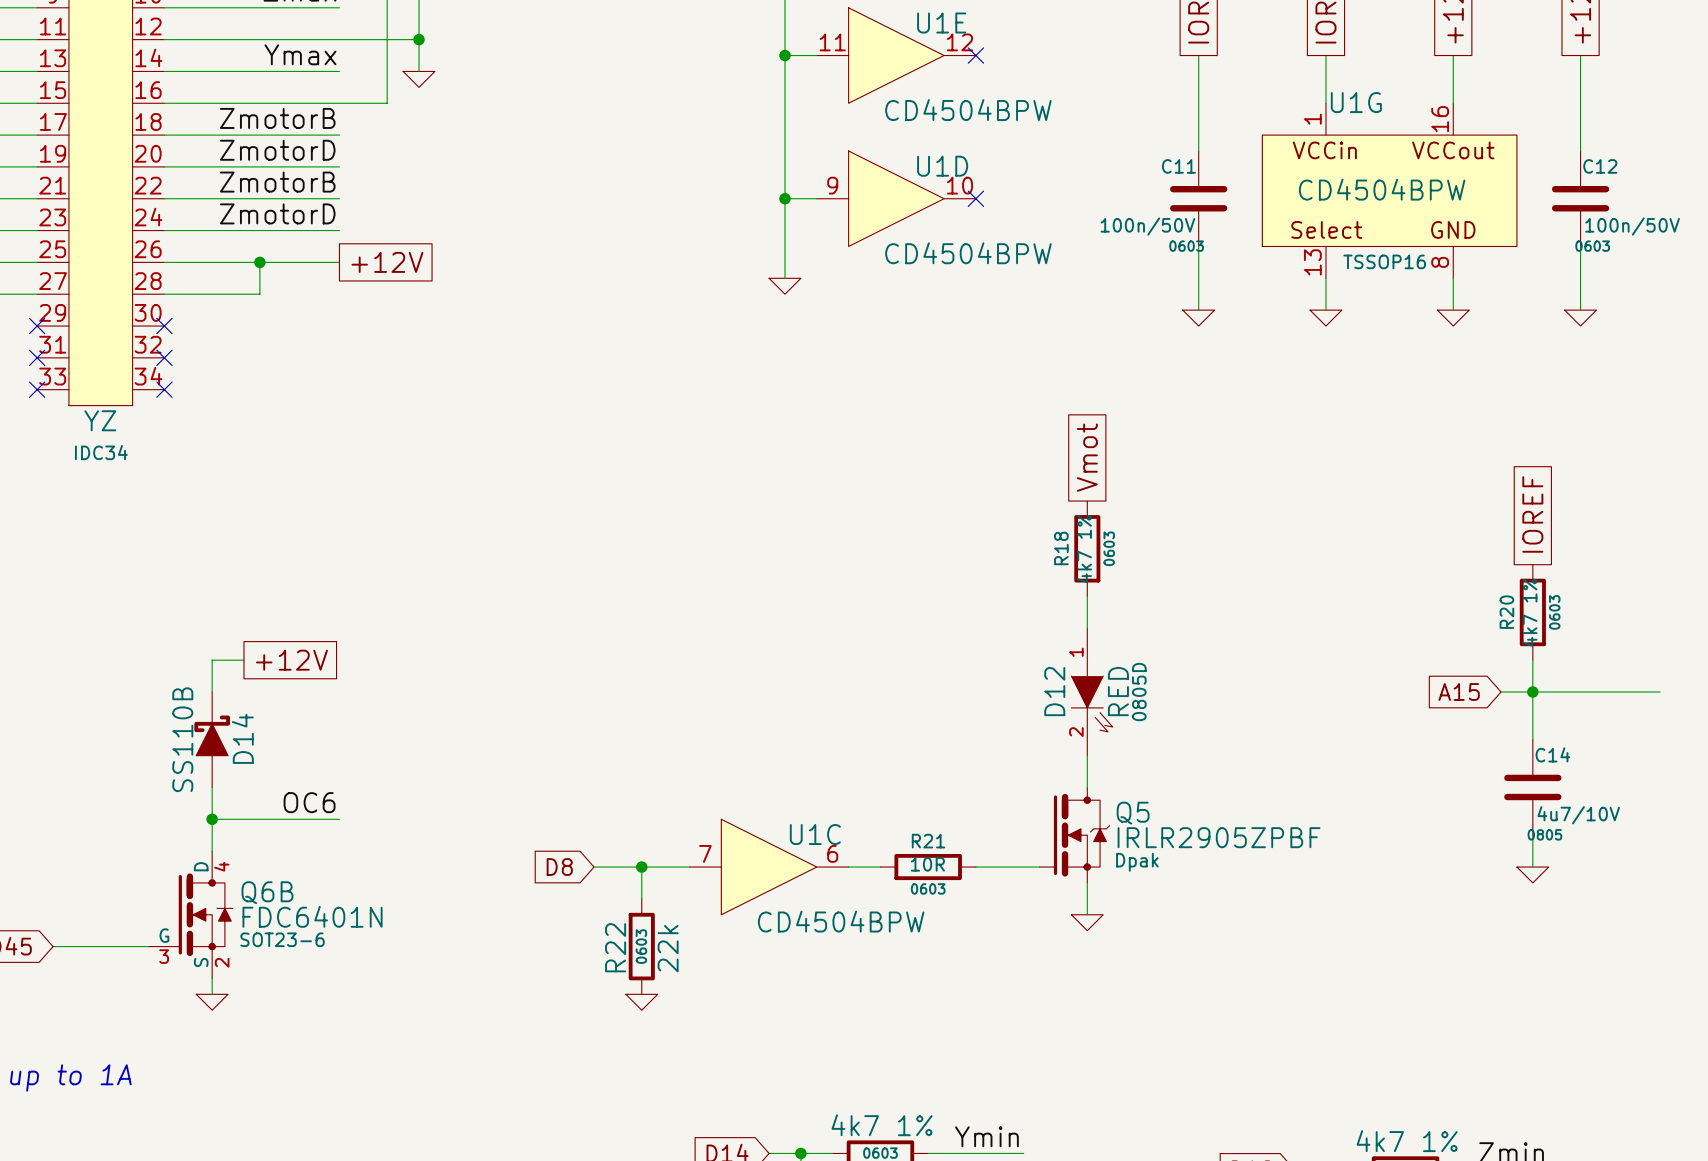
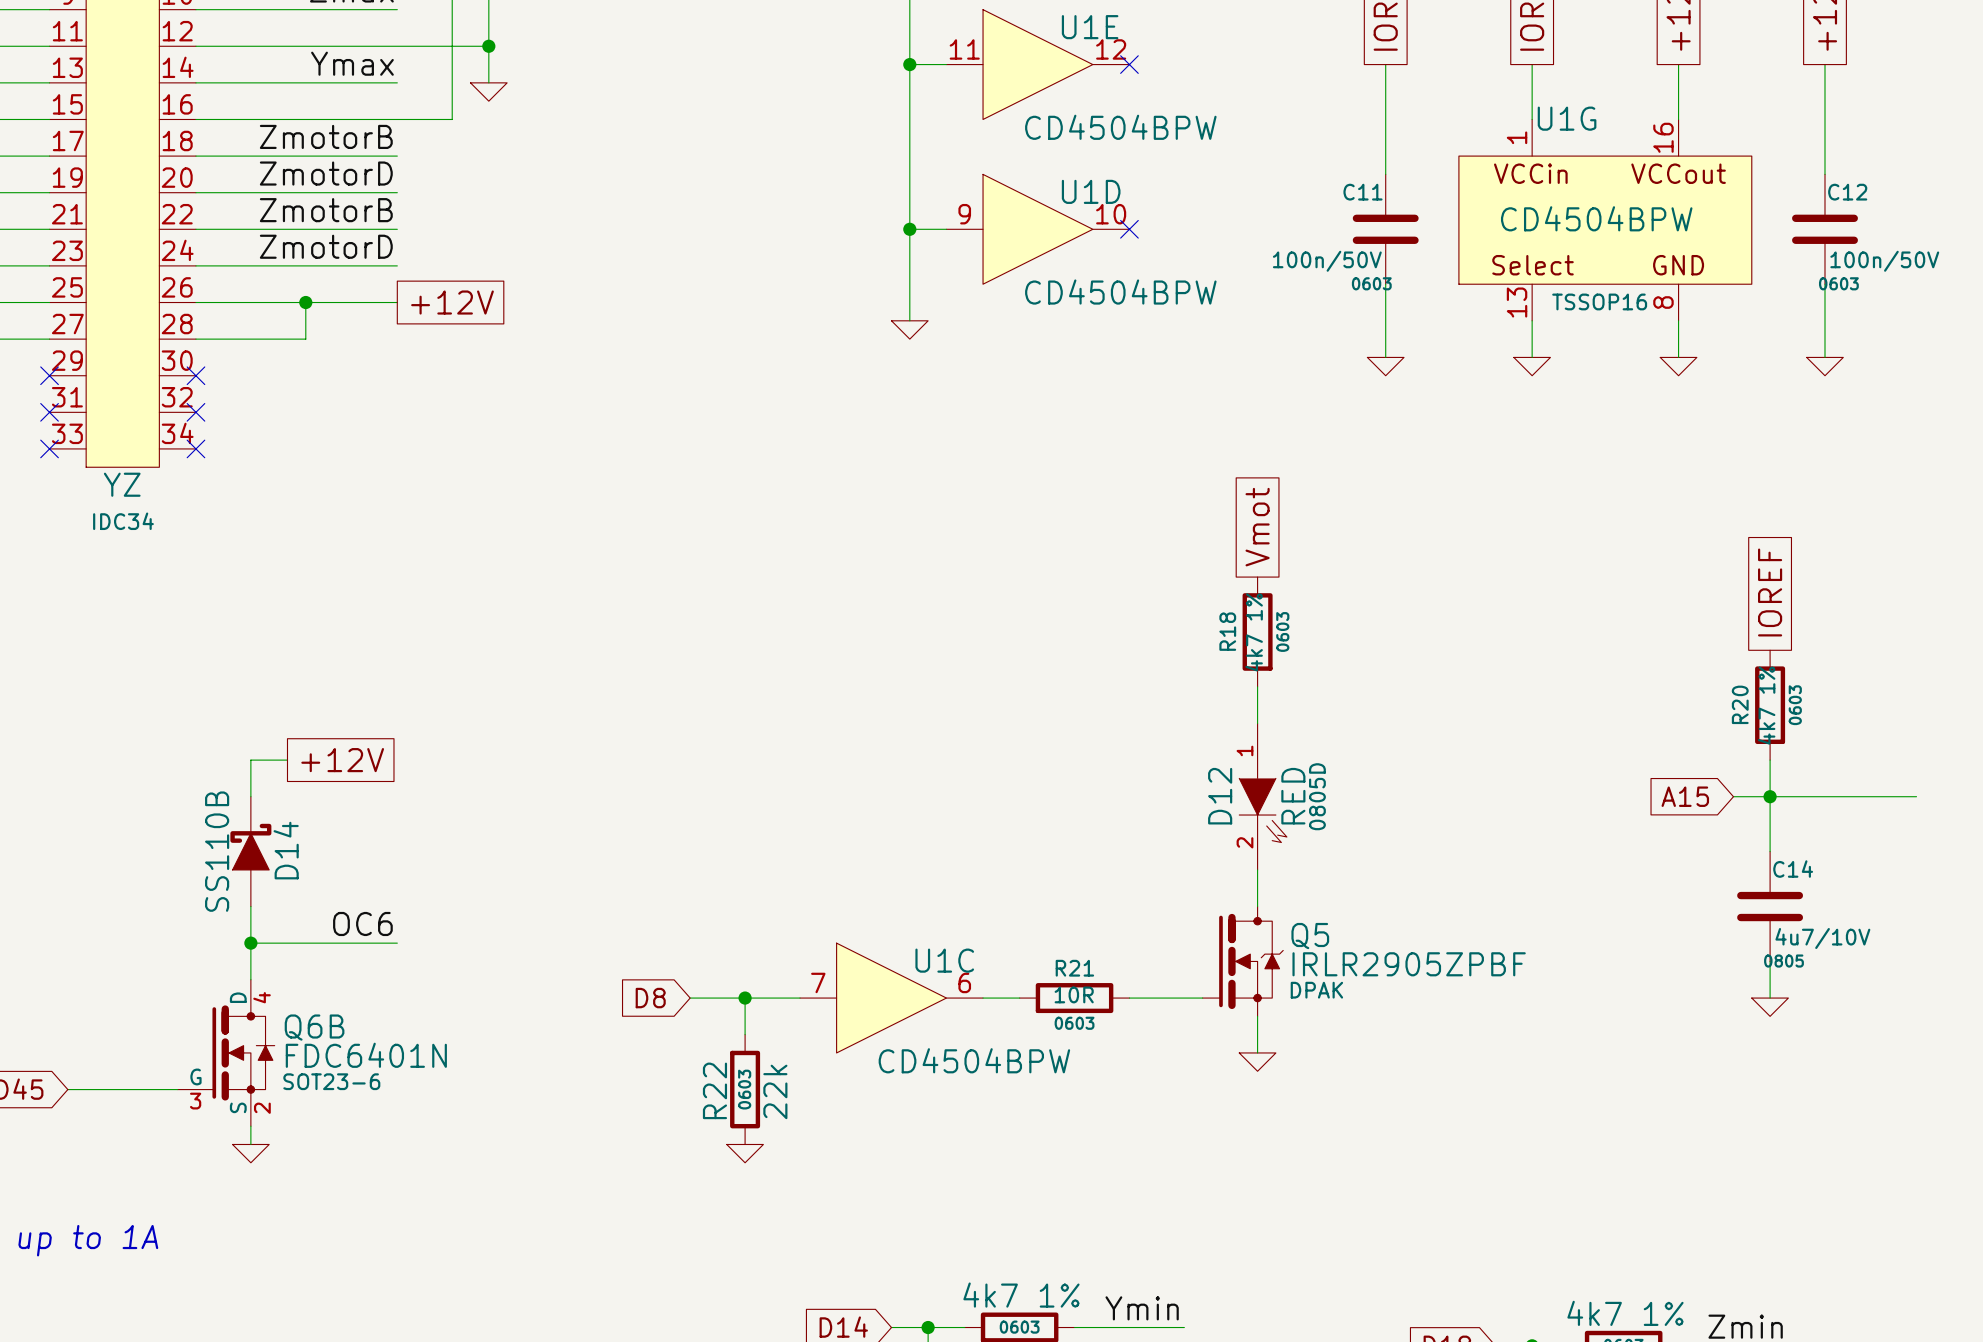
Q5 text: Dpak (1137, 862) -> DPAK (1316, 990)

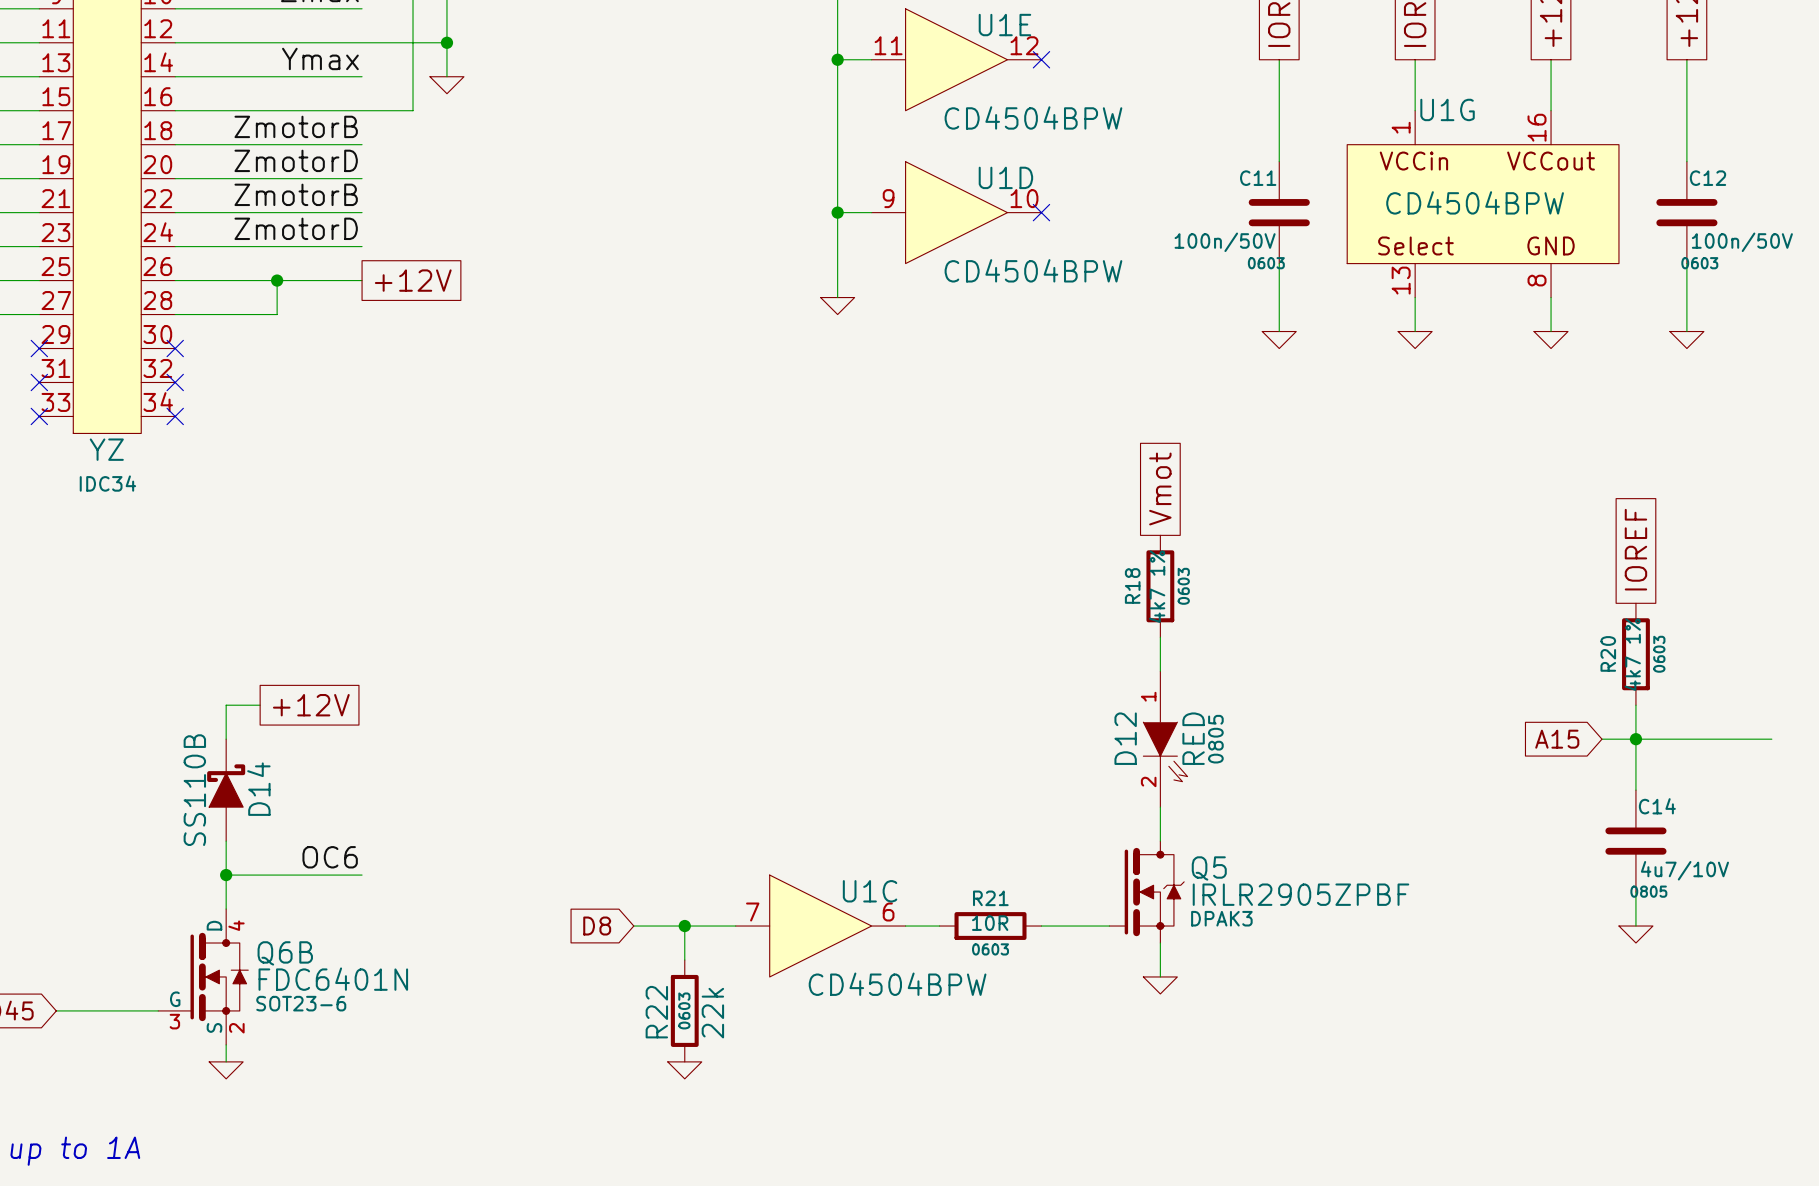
U1G text: TSSOP16 (1599, 301) -> none
D12 text: 0805D (1317, 796) -> 0805 (1215, 739)
Q5 text: DPAK (1316, 990) -> DPAK3 (1221, 918)

